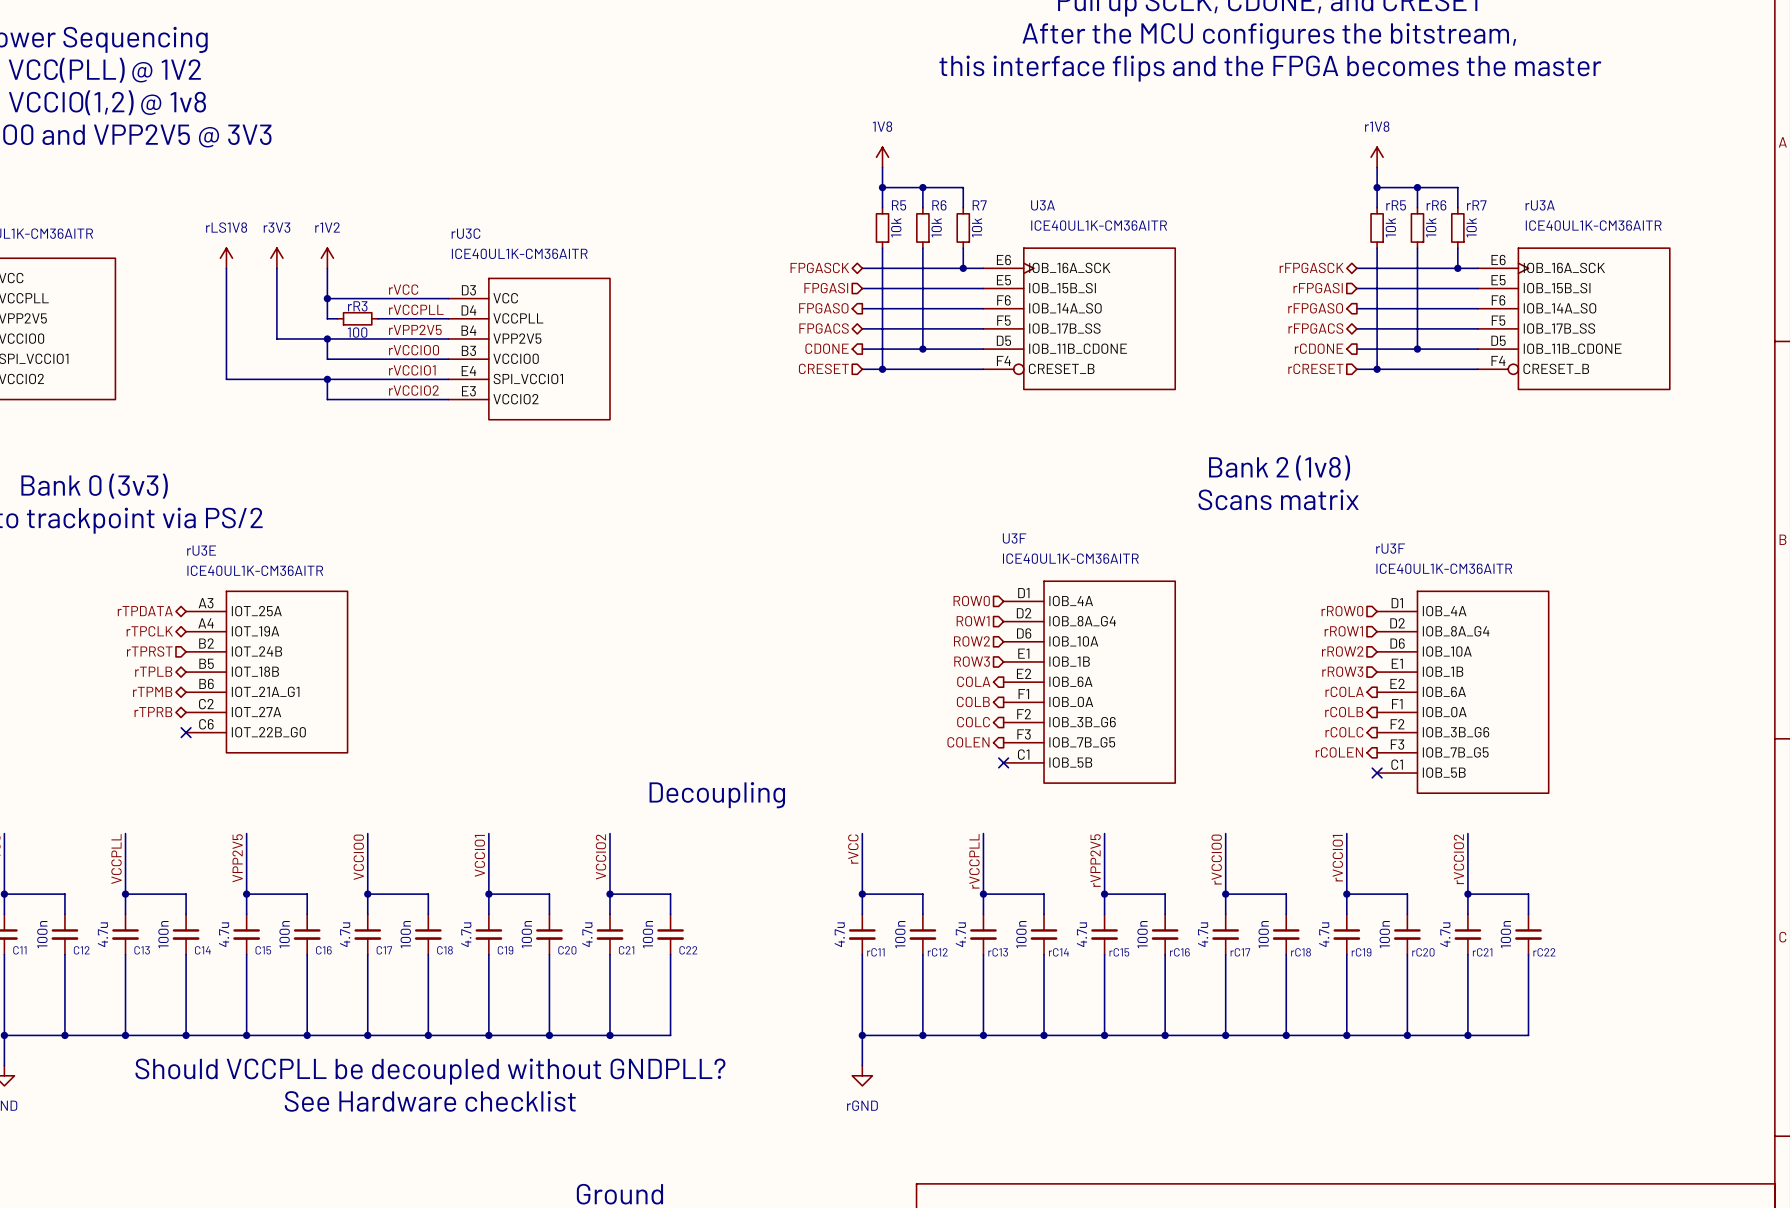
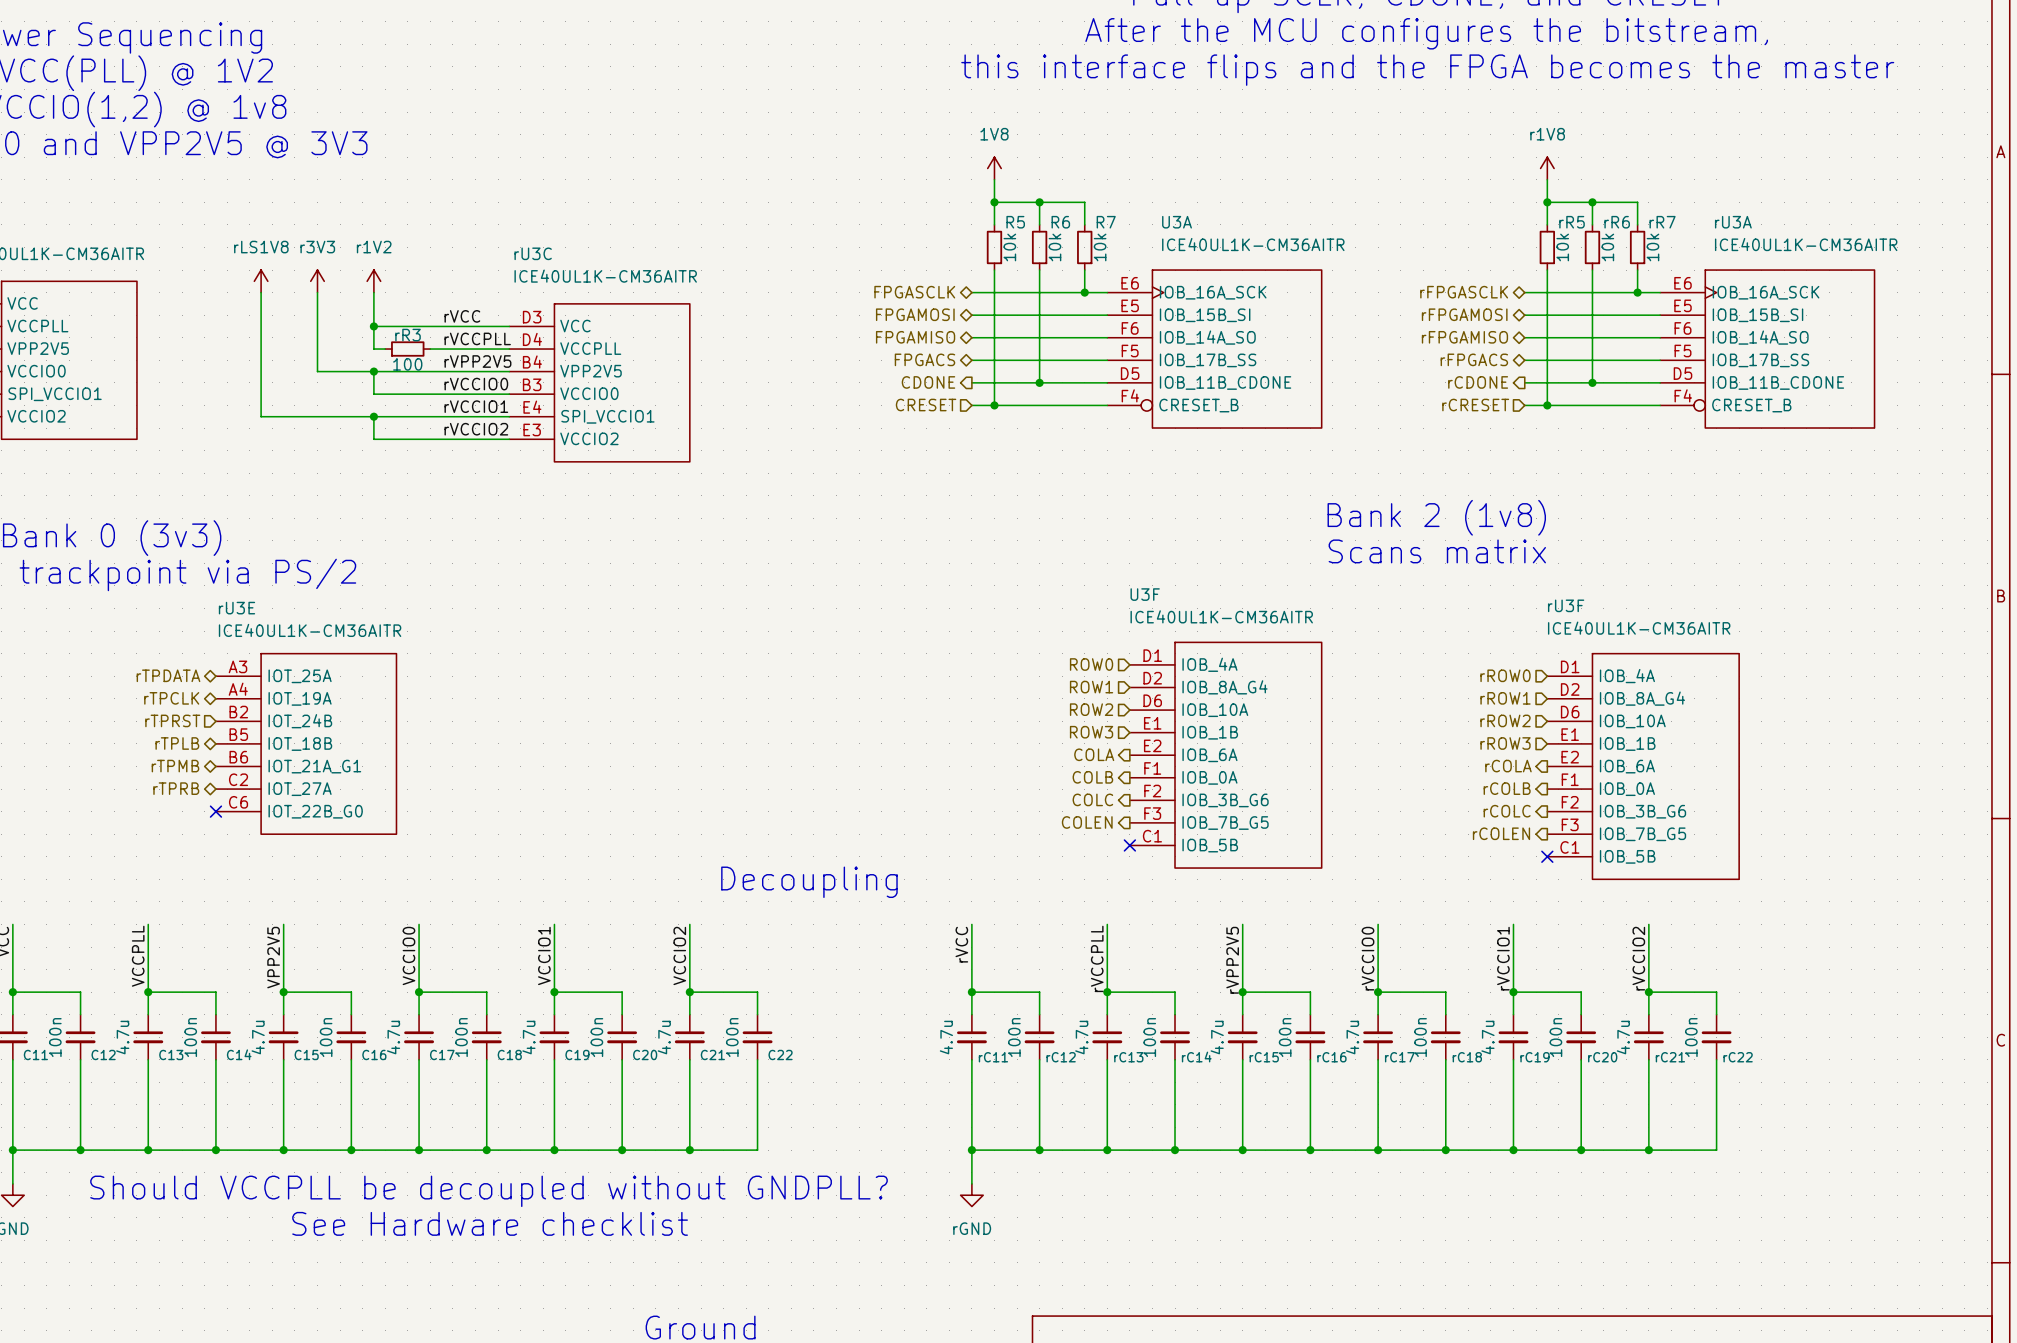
hierarchical label: FPGASCK (819, 267) -> FPGASCLK (914, 292)
hierarchical label: rFPGASCK (1311, 267) -> rFPGASCLK (1464, 292)
hierarchical label shape: input (826, 288) -> bidirectional (915, 314)
hierarchical label: FPGASI (826, 288) -> FPGAMOSI (915, 314)
hierarchical label shape: input (1318, 288) -> bidirectional (1464, 314)
hierarchical label: rFPGASI (1318, 288) -> rFPGAMOSI (1464, 314)
hierarchical label shape: output (823, 308) -> bidirectional (915, 337)
hierarchical label: FPGASO (823, 308) -> FPGAMISO (915, 337)
hierarchical label shape: output (1315, 308) -> bidirectional (1464, 337)
hierarchical label: rFPGASO (1315, 308) -> rFPGAMISO (1464, 337)

